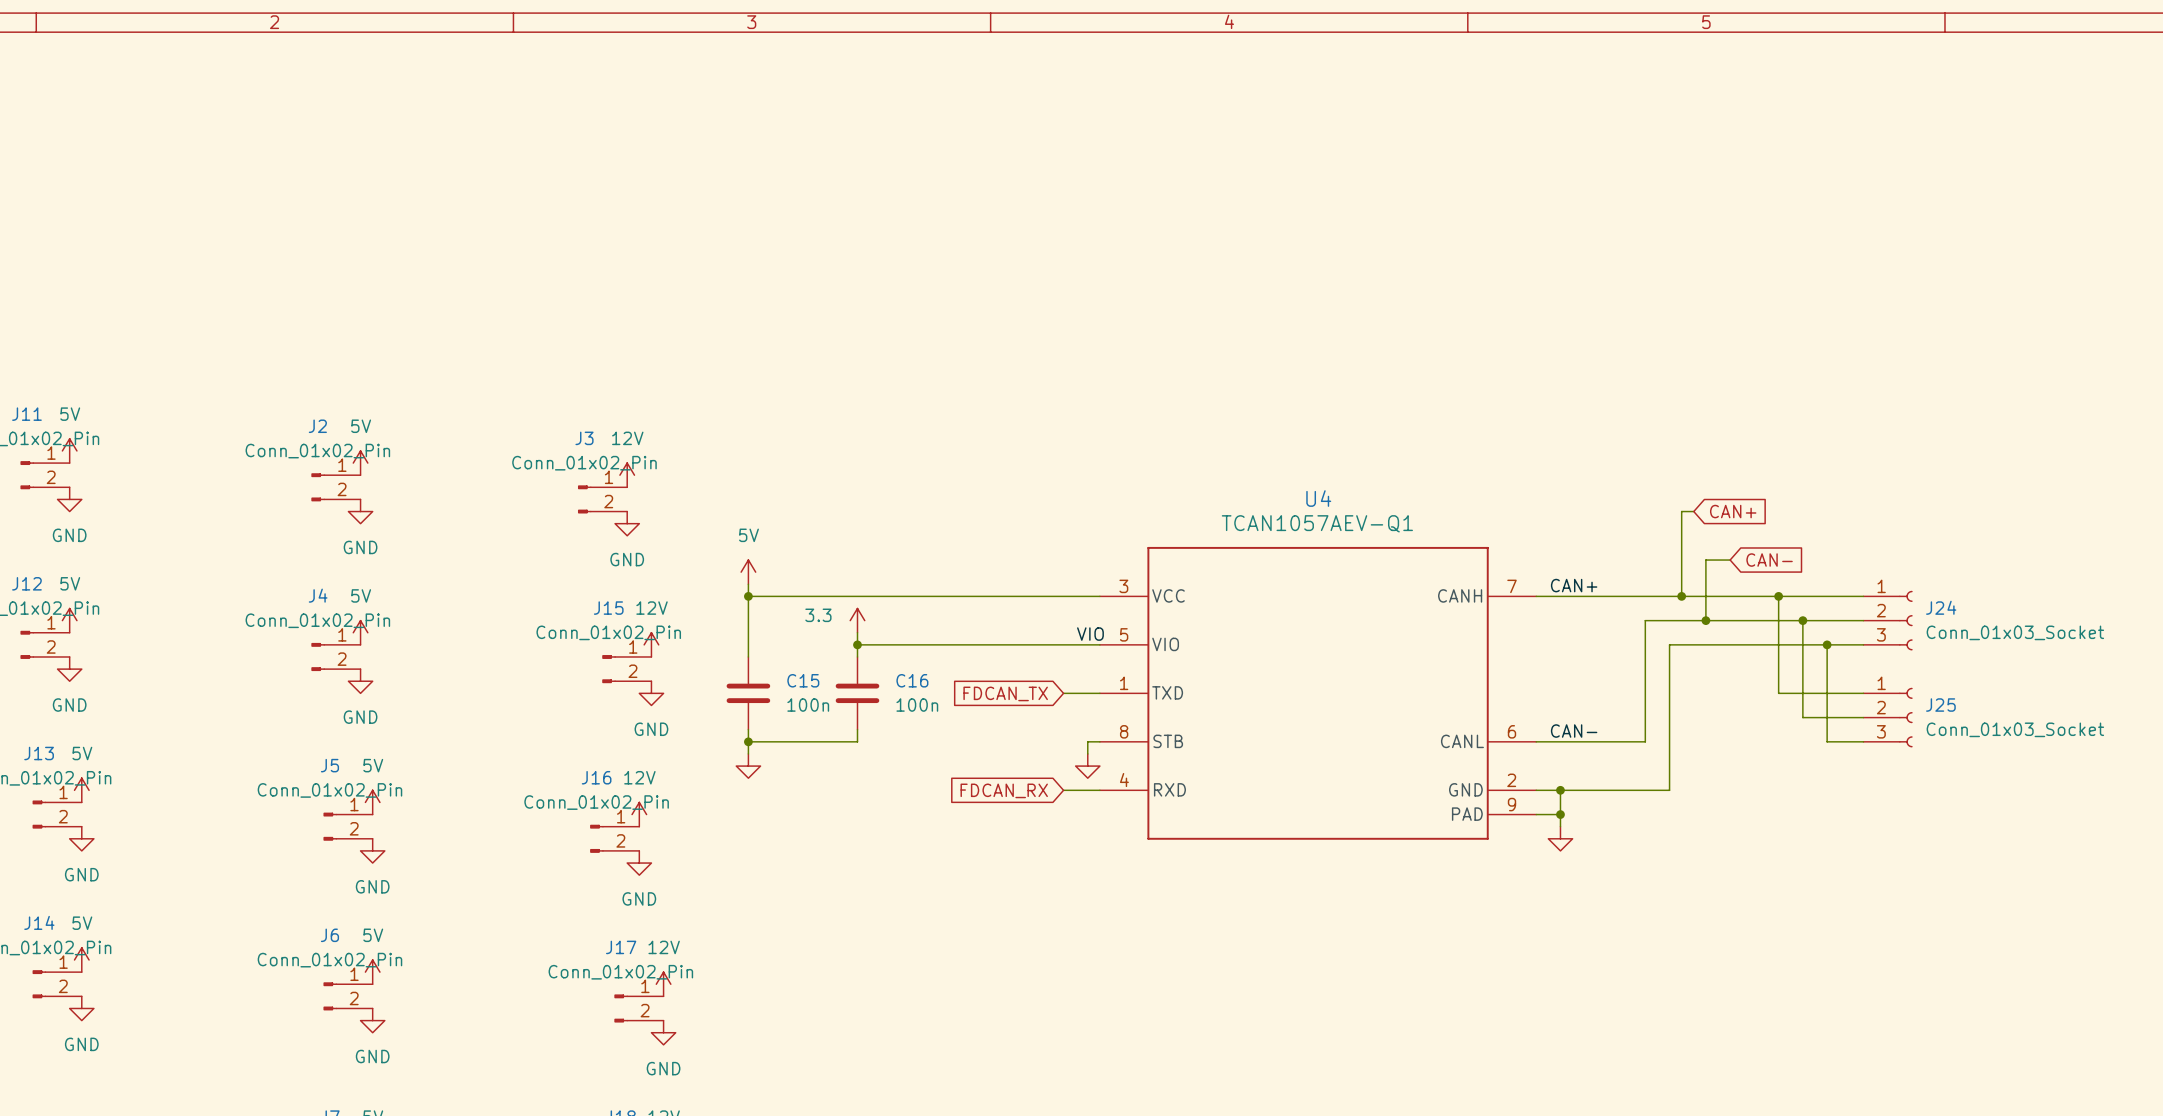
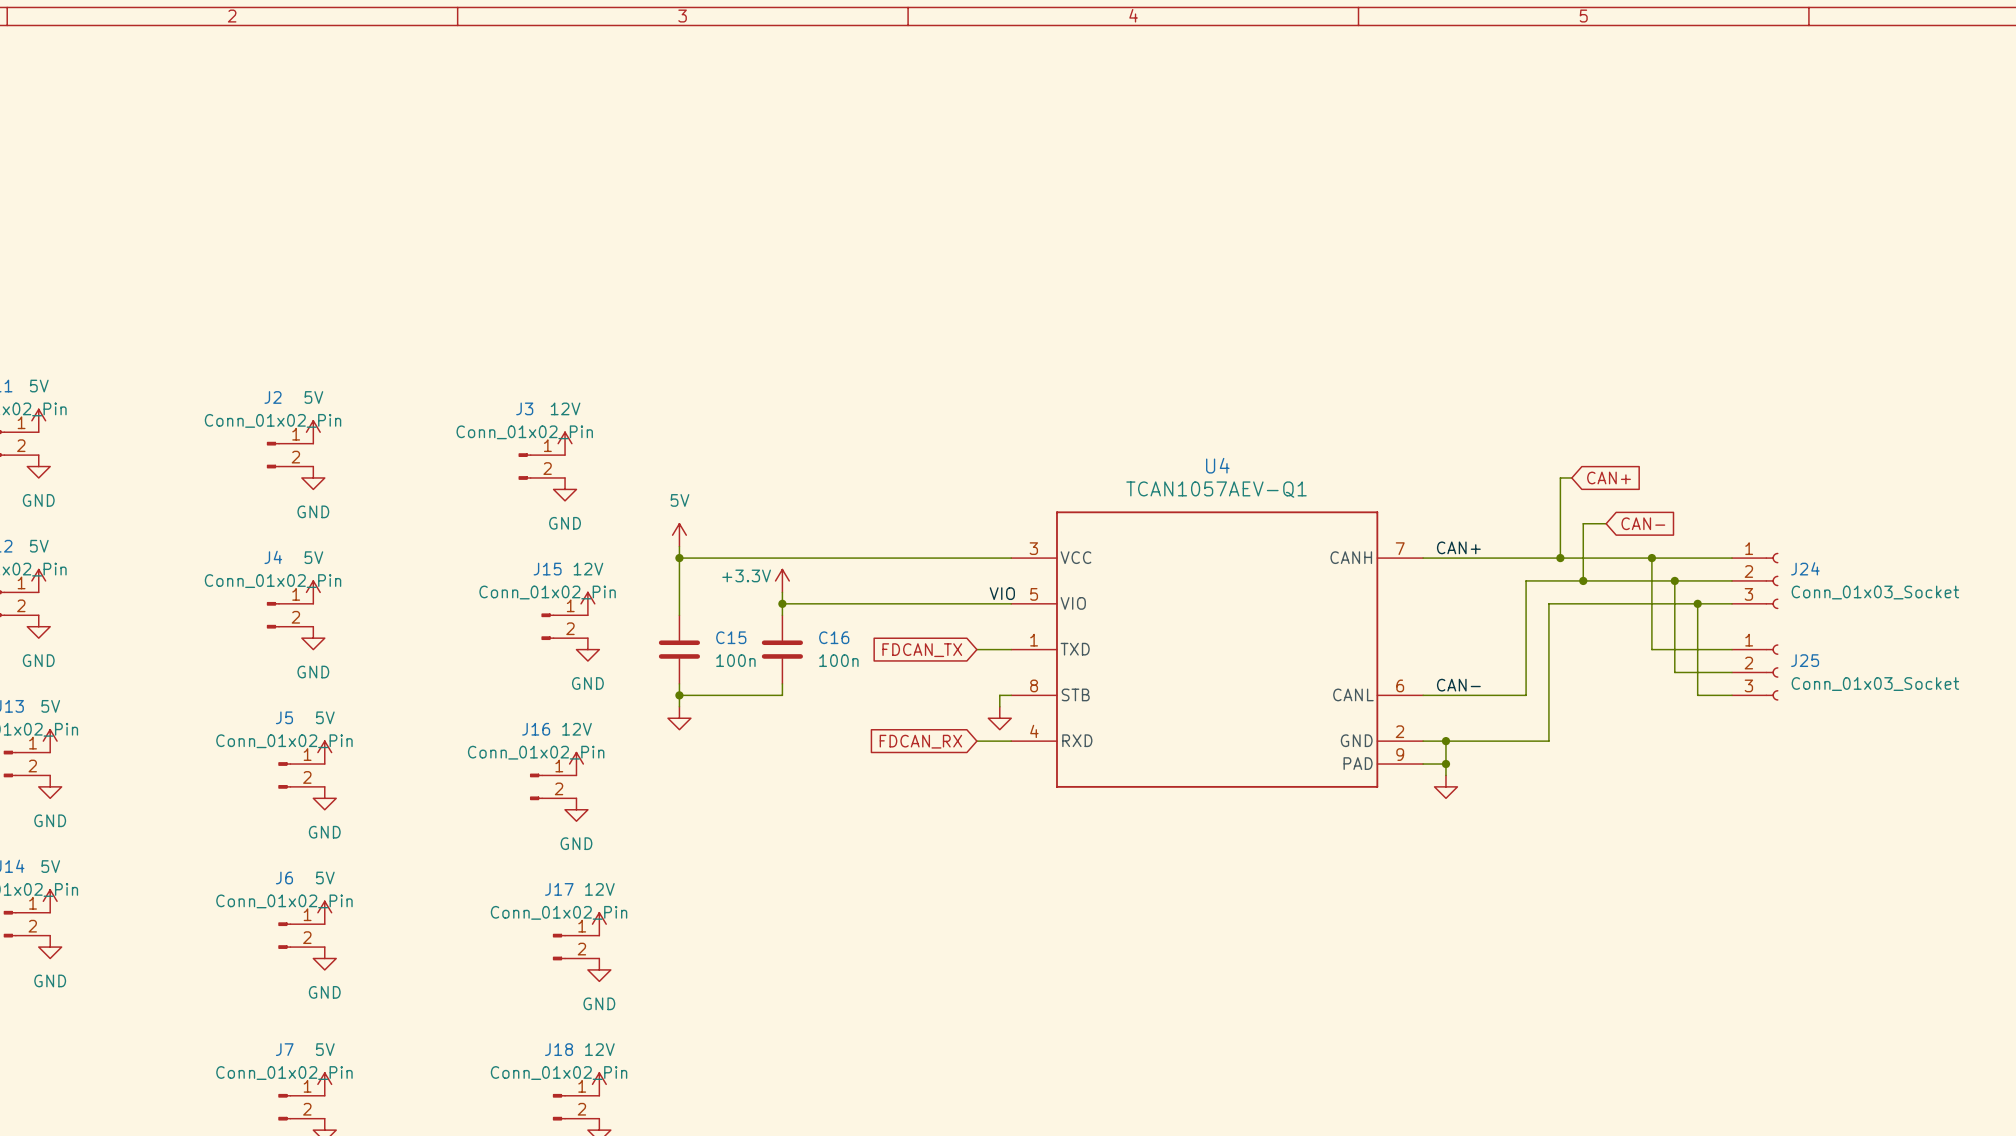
power symbol: 3.3 (857, 620) -> +3.3V (782, 580)

